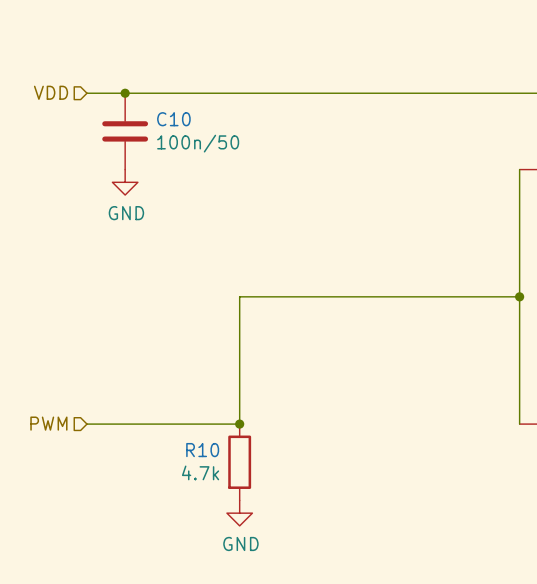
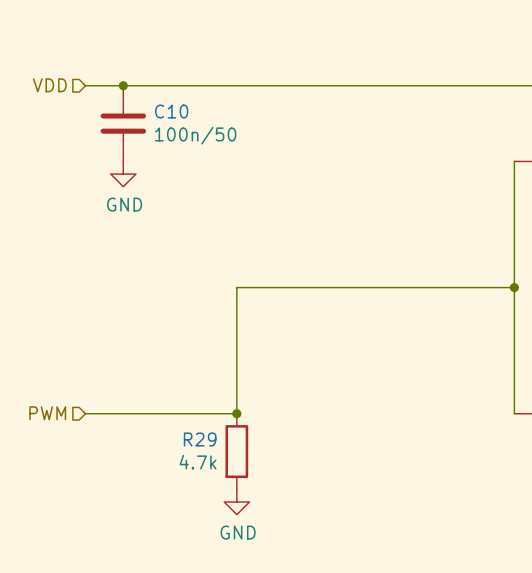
R10 name: R10 (202, 450) -> R29 (200, 439)

